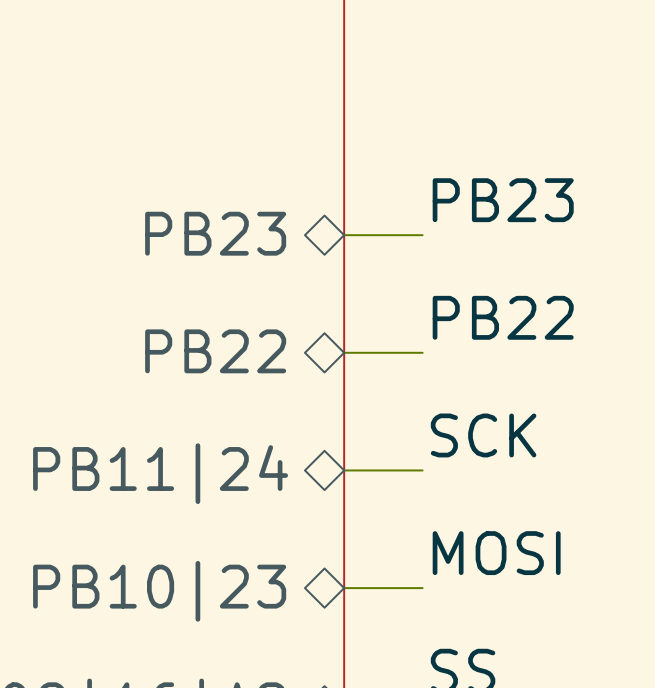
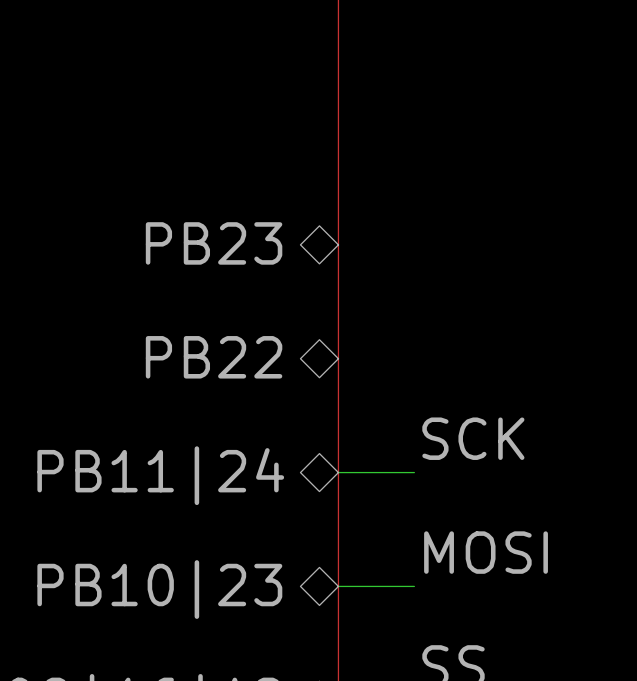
label: PB23 (503, 200) -> none
wire: (344, 235) (422, 235) -> none
label: PB22 (503, 317) -> none
wire: (344, 352) (422, 352) -> none

